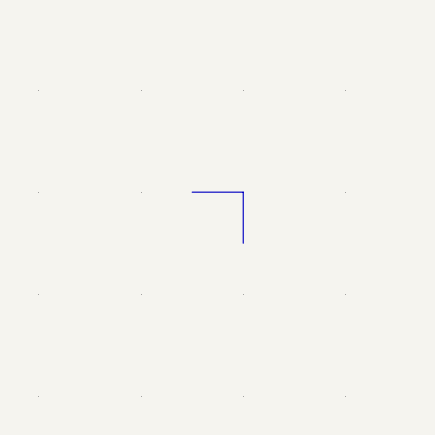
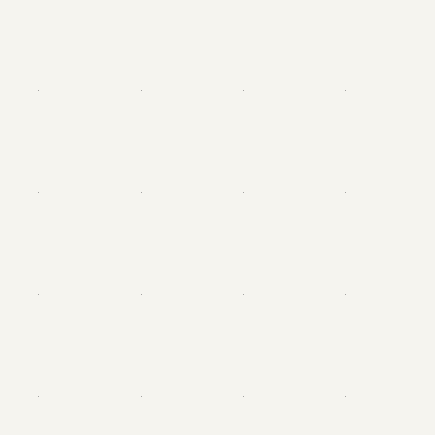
bus: (192, 192) (243, 192) (243, 243) -> none

